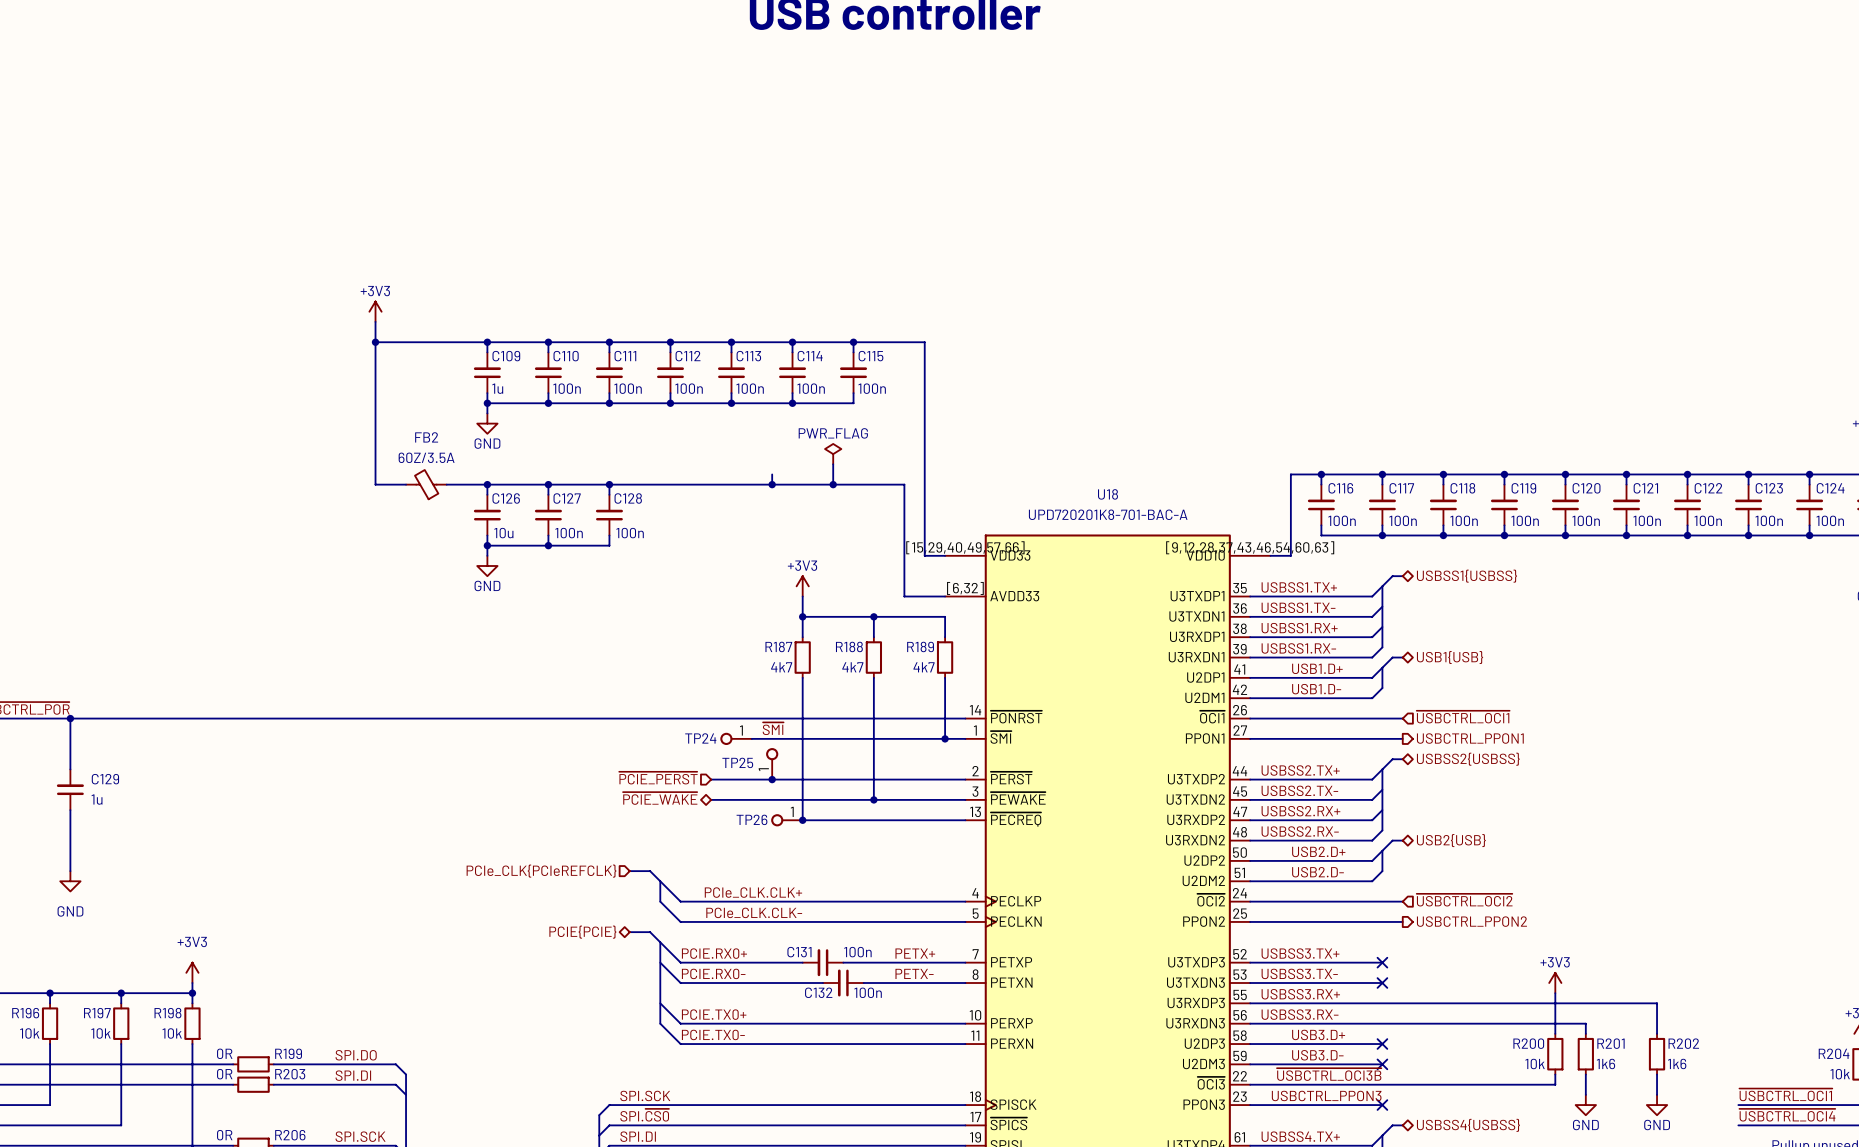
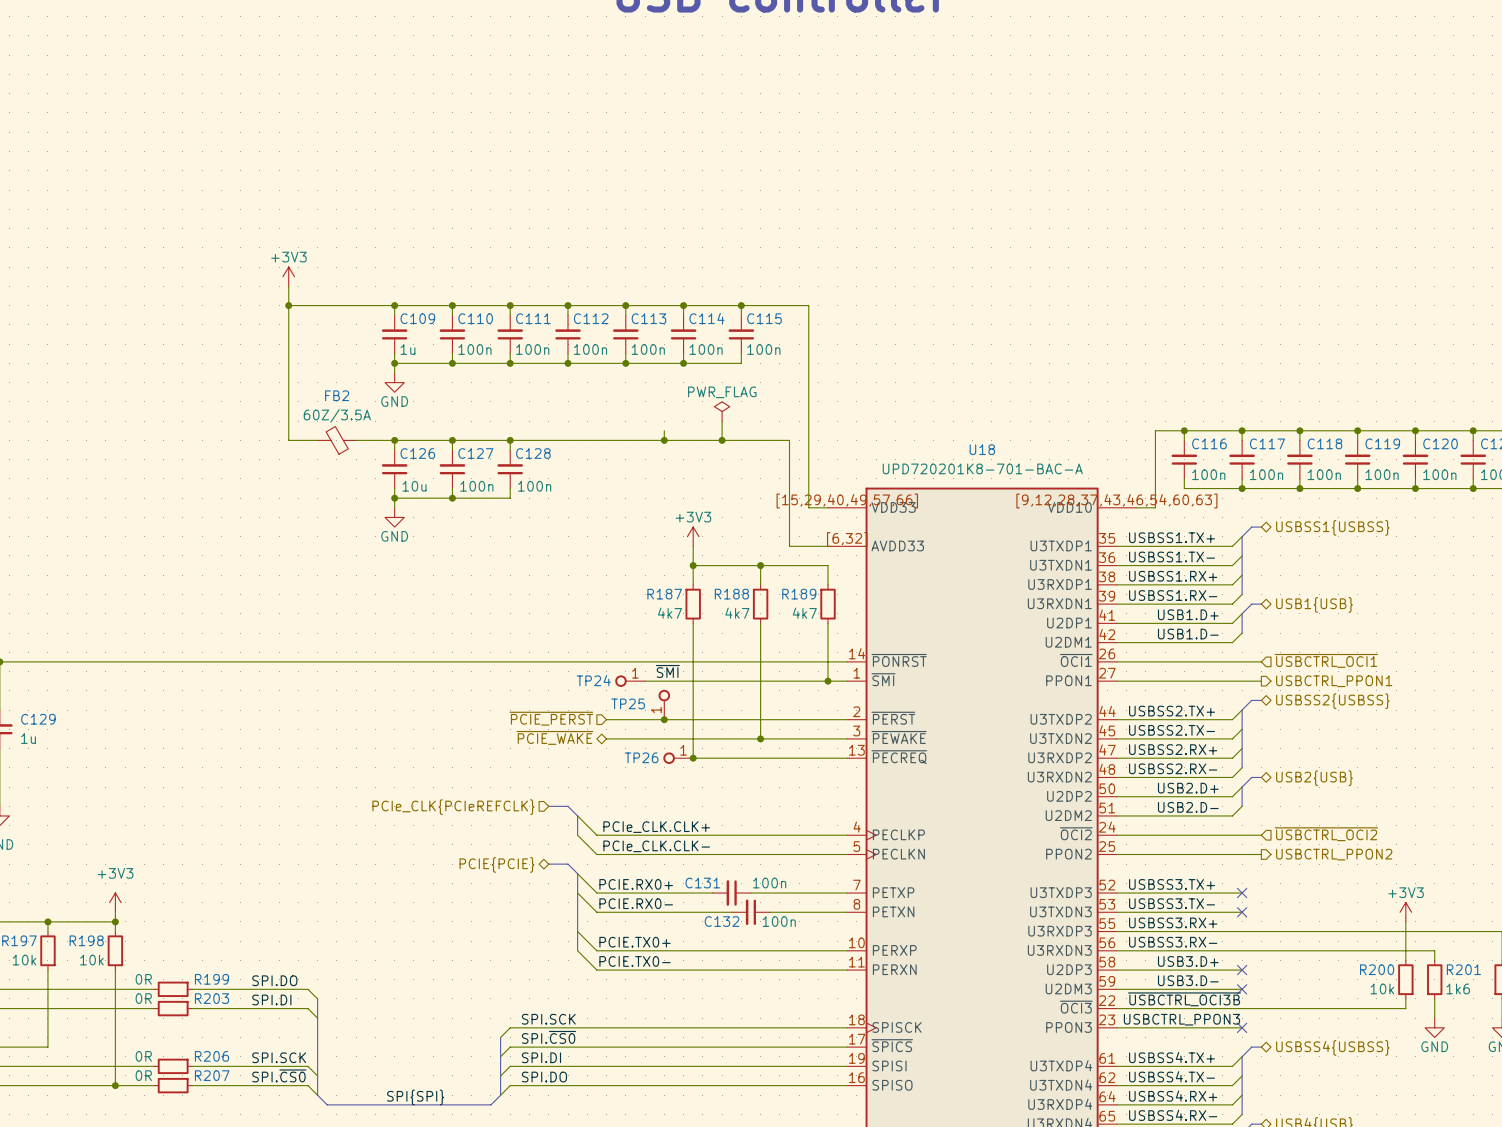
hierarchical label position: PCIe_CLK{PCIeREFCLK} (541, 871) -> PCIe_CLK{PCIeREFCLK} (453, 807)
bus: (629, 871) (650, 871) (660, 881) (660, 901) -> (548, 806) (568, 806) (577, 815) (577, 835)
wire: (660, 881) (680, 901) (700, 901) -> (577, 815) (596, 835)
label position: PCIe_CLK.CLK+ (753, 892) -> PCIe_CLK.CLK+ (656, 827)
wire: (660, 901) (680, 921) (700, 921) -> (577, 835) (596, 854)
label position: PCIe_CLK.CLK- (754, 912) -> PCIe_CLK.CLK- (656, 846)
hierarchical label position: PCIE{PCIE} (582, 932) -> PCIE{PCIE} (497, 864)
bus: (629, 932) (650, 932) (660, 942) (660, 1023) -> (548, 864) (568, 864) (577, 873) (577, 950)
wire: (660, 942) (680, 962) (700, 962) -> (577, 873) (596, 893)
label position: PCIE.RX0+ (714, 953) -> PCIE.RX0+ (636, 884)
label: PETX+ (915, 953) -> none
wire: (660, 962) (680, 982) (700, 982) -> (577, 893) (596, 912)
C131 position: (823, 962) -> (731, 893)
label position: PCIE.RX0- (713, 973) -> PCIE.RX0- (636, 903)
label: PETX- (914, 973) -> none
C132 position: (843, 982) -> (750, 912)
wire: (660, 1003) (680, 1023) (700, 1023) -> (577, 931) (596, 950)
label position: PCIE.TX0+ (714, 1014) -> PCIE.TX0+ (635, 942)
wire: (660, 1023) (680, 1044) (700, 1044) -> (577, 950) (596, 970)
label position: PCIE.TX0- (713, 1034) -> PCIE.TX0- (635, 961)

